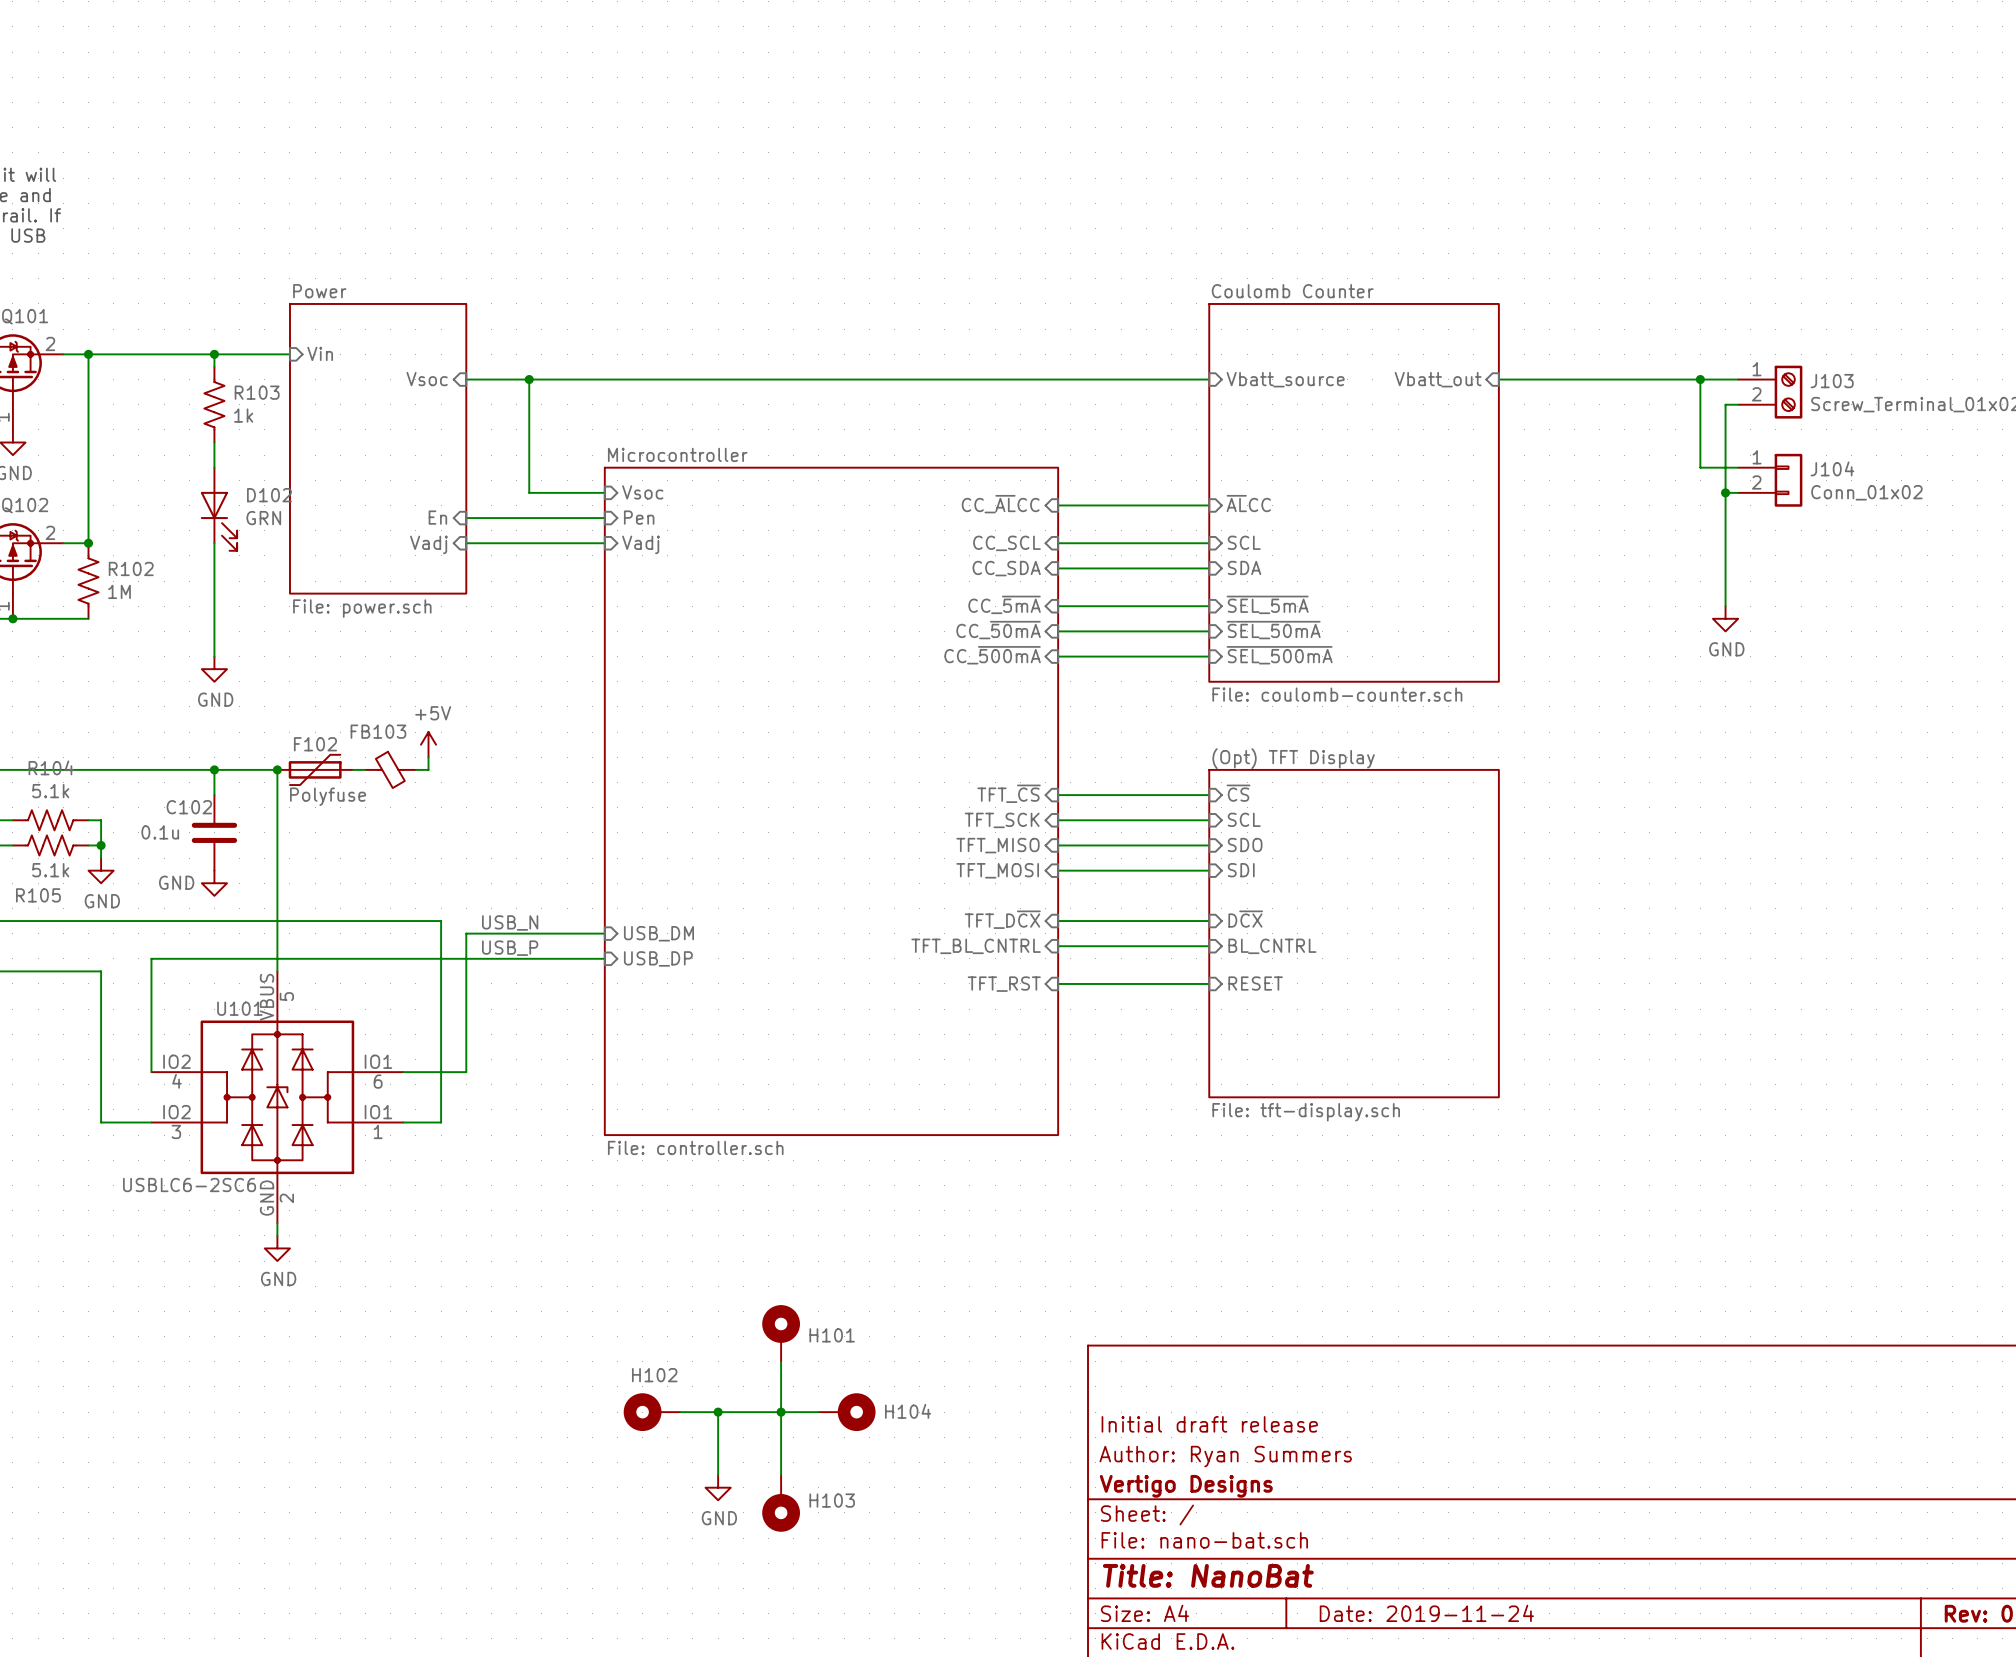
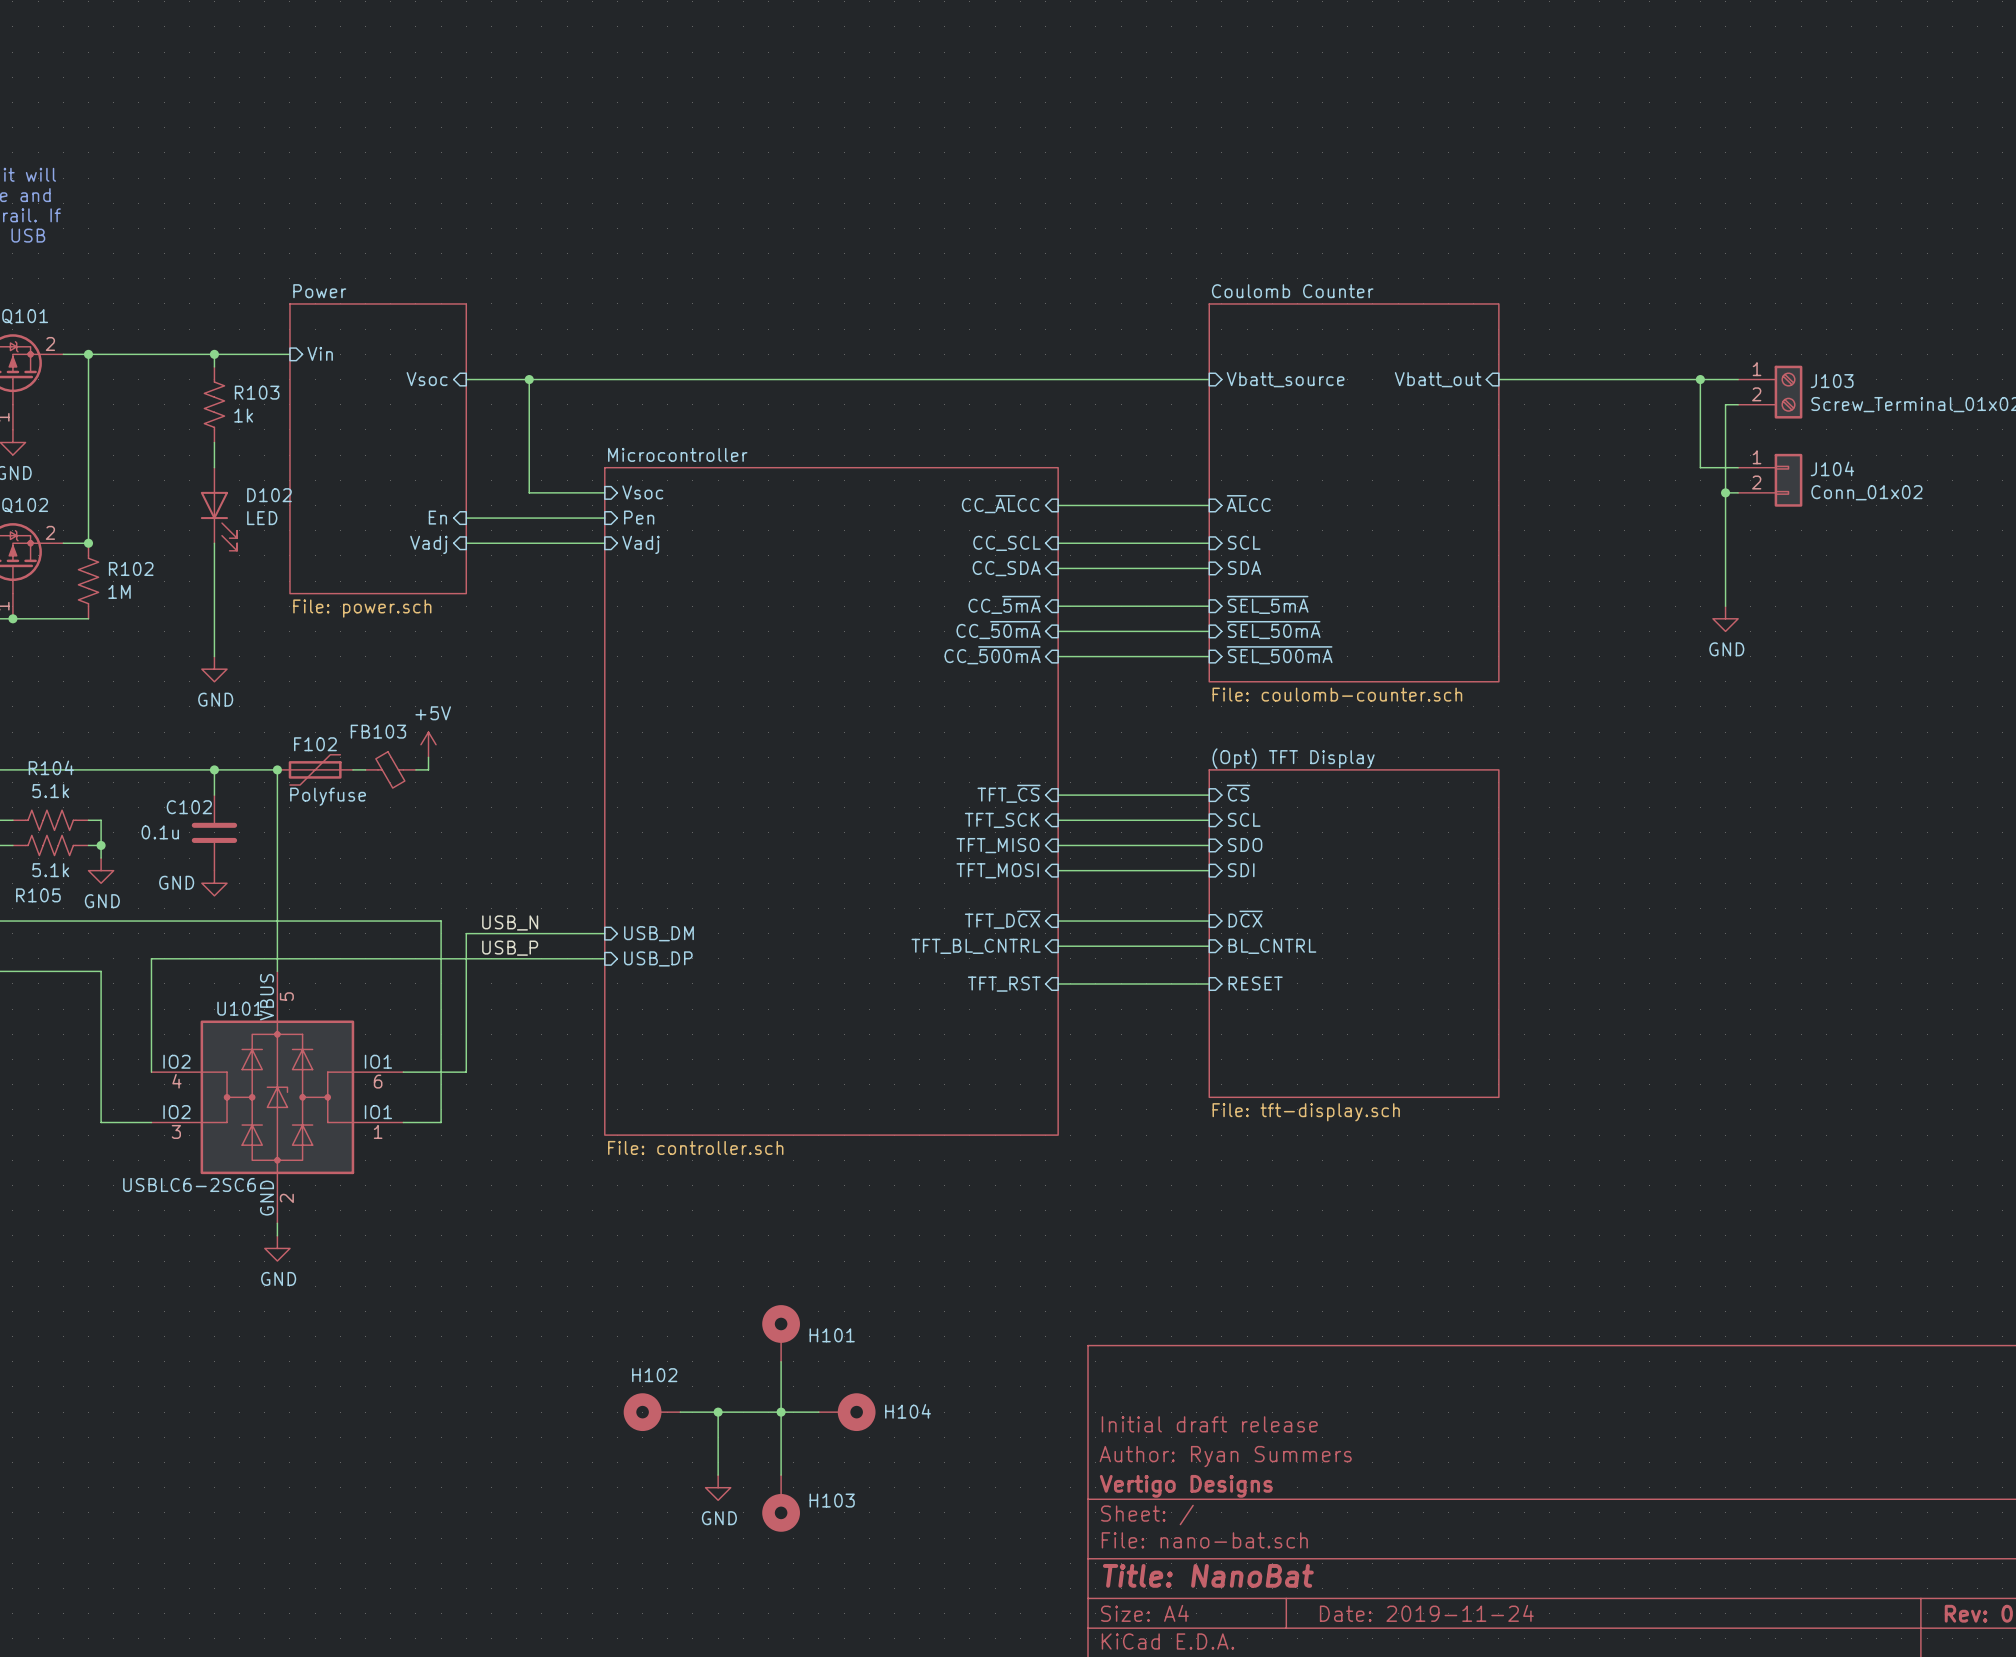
D102 value: GRN (263, 518) -> LED (262, 518)

